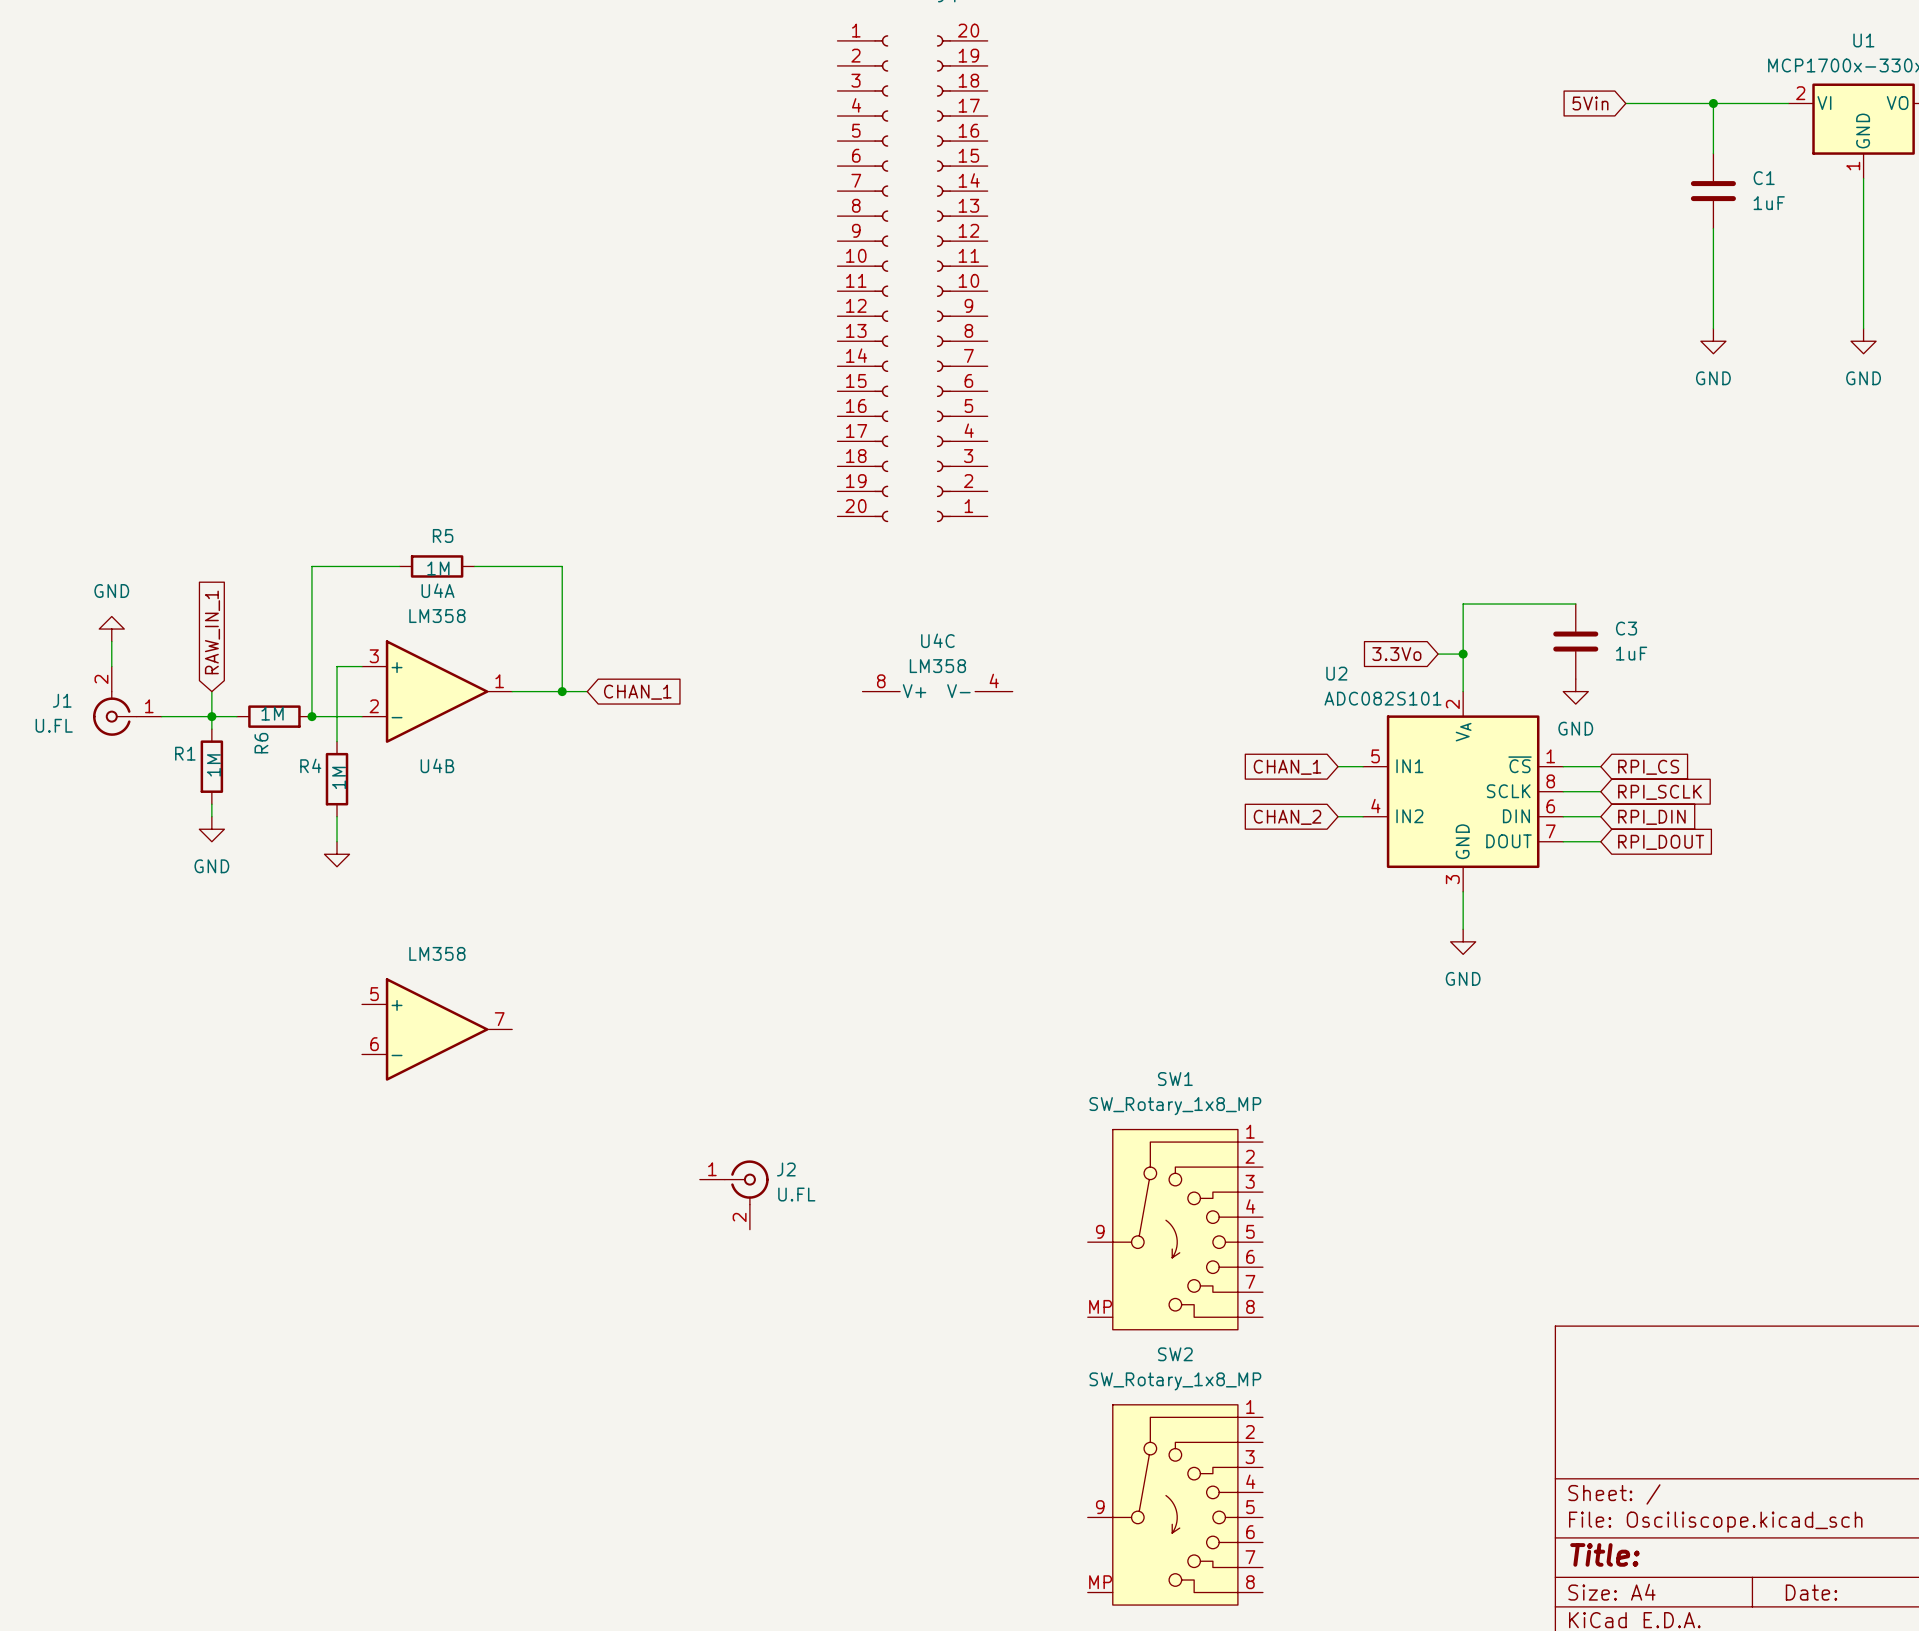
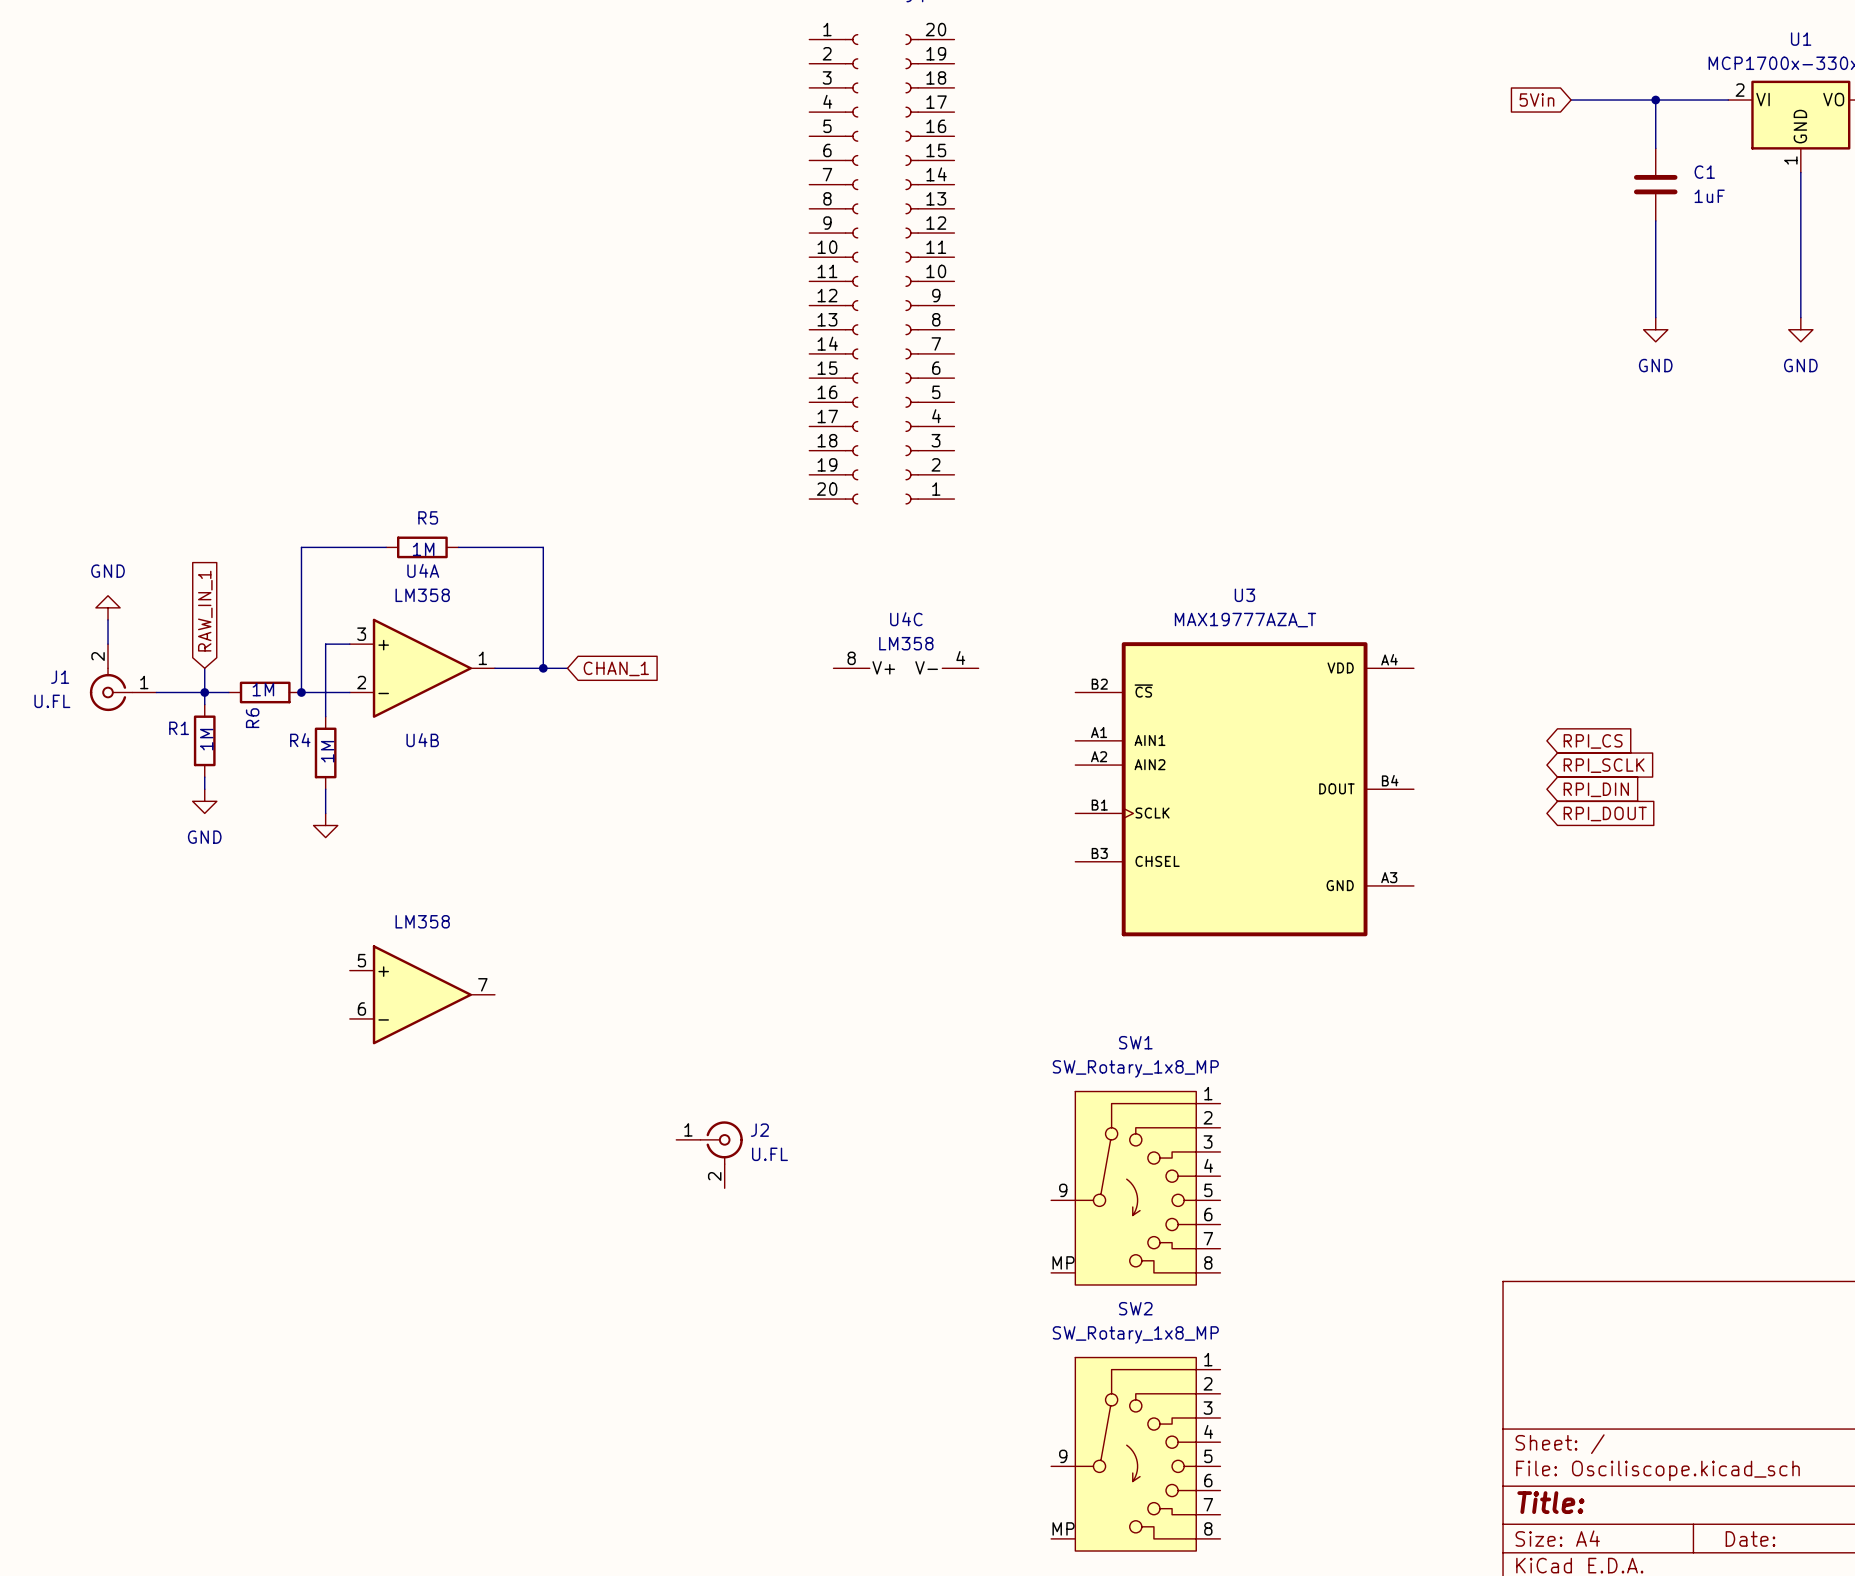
wire: (1575, 604) (1463, 604) (1463, 691) -> none
C3: 1uF (1575, 641) -> none
global label: 3.3Vo (1396, 654) -> none
wire: (1438, 654) (1463, 654) -> none
junction: (1463, 654) -> none
power symbol: GND (1575, 691) -> none
wire: (1563, 766) (1600, 766) -> none
global label: CHAN_1 (1287, 767) -> none
U2: ADC082S101 (1463, 791) -> none
wire: (1563, 791) (1600, 791) -> none
U3: none -> MAX19777AZA_T (1244, 789)
wire: (1563, 816) (1600, 816) -> none
global label: CHAN_2 (1287, 817) -> none
wire: (1563, 841) (1600, 841) -> none
wire: (1463, 891) (1463, 929) -> none
power symbol: GND (1463, 941) -> none

